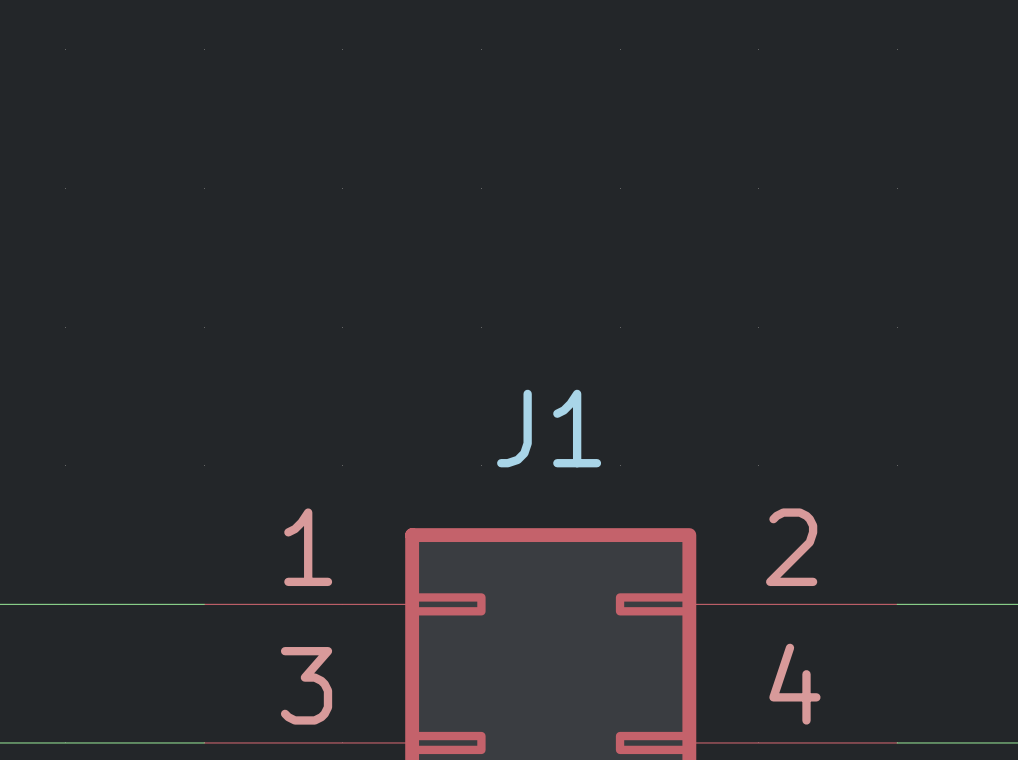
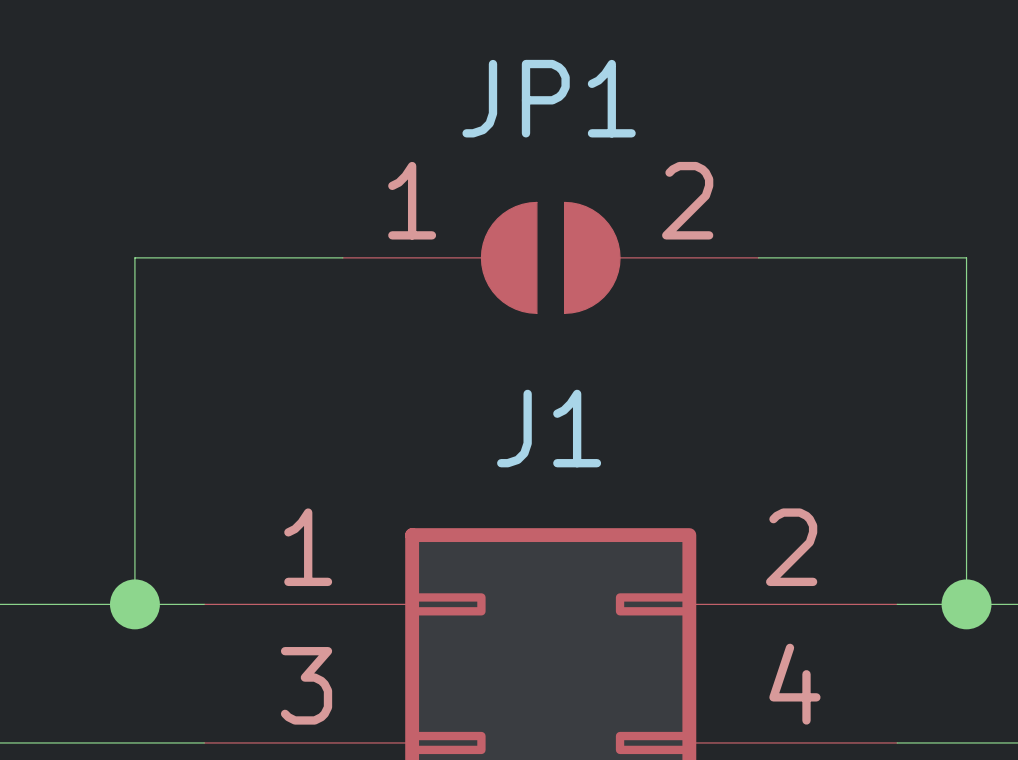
wire: none -> (342, 257) (134, 257) (134, 604)
JP1: none -> (550, 257)
wire: none -> (758, 257) (966, 257) (966, 604)
junction: none -> (134, 604)
junction: none -> (966, 604)

